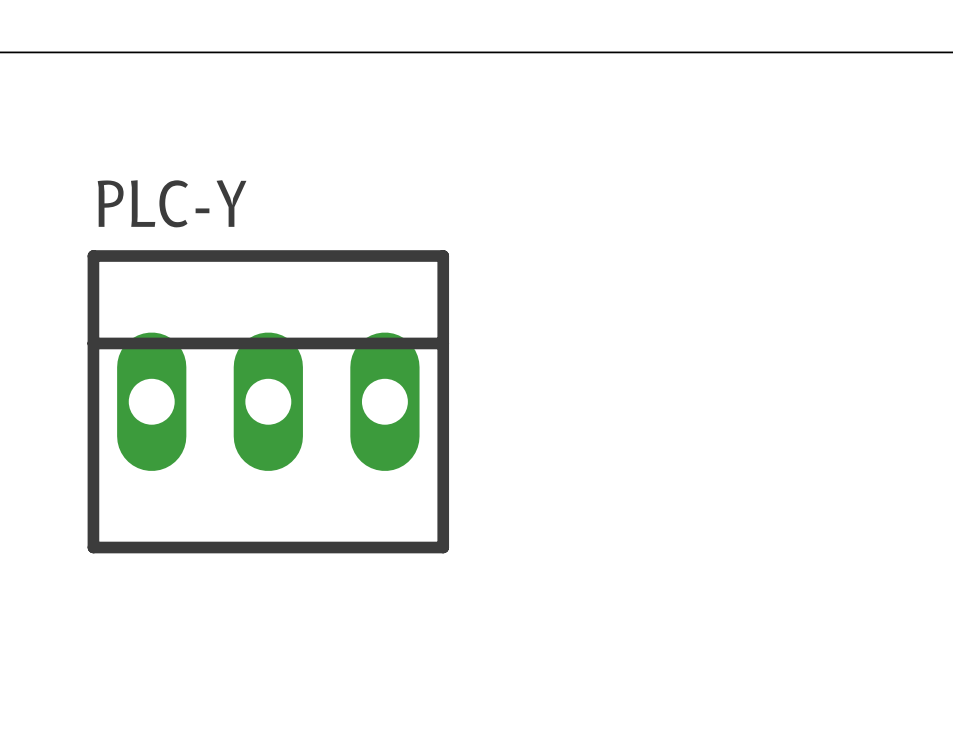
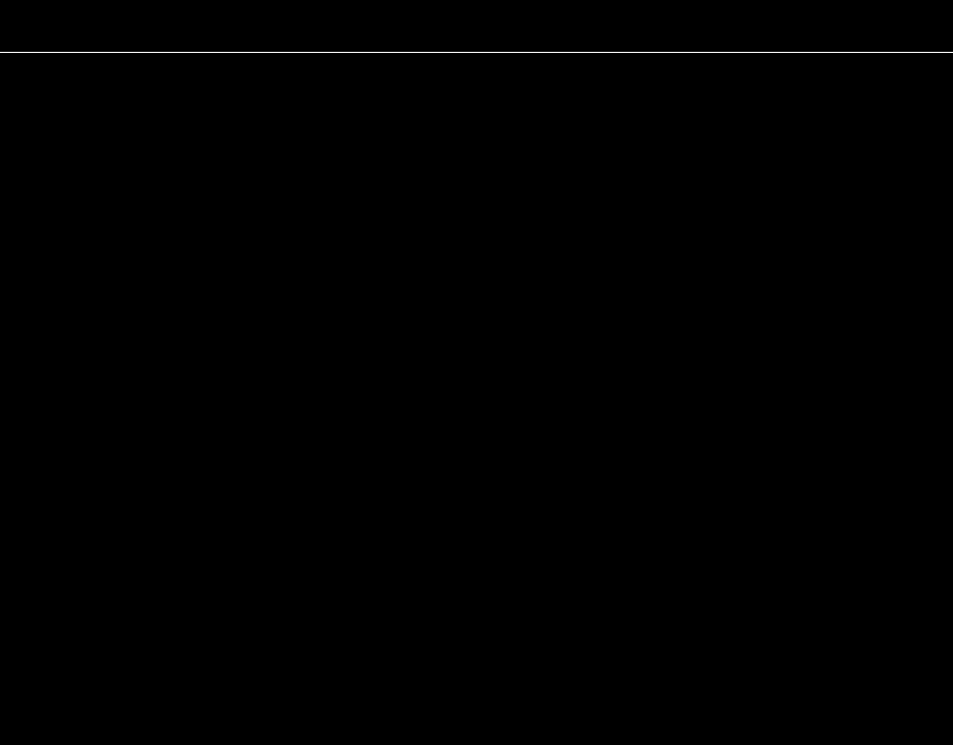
PLC-Y: (268, 401) -> none

